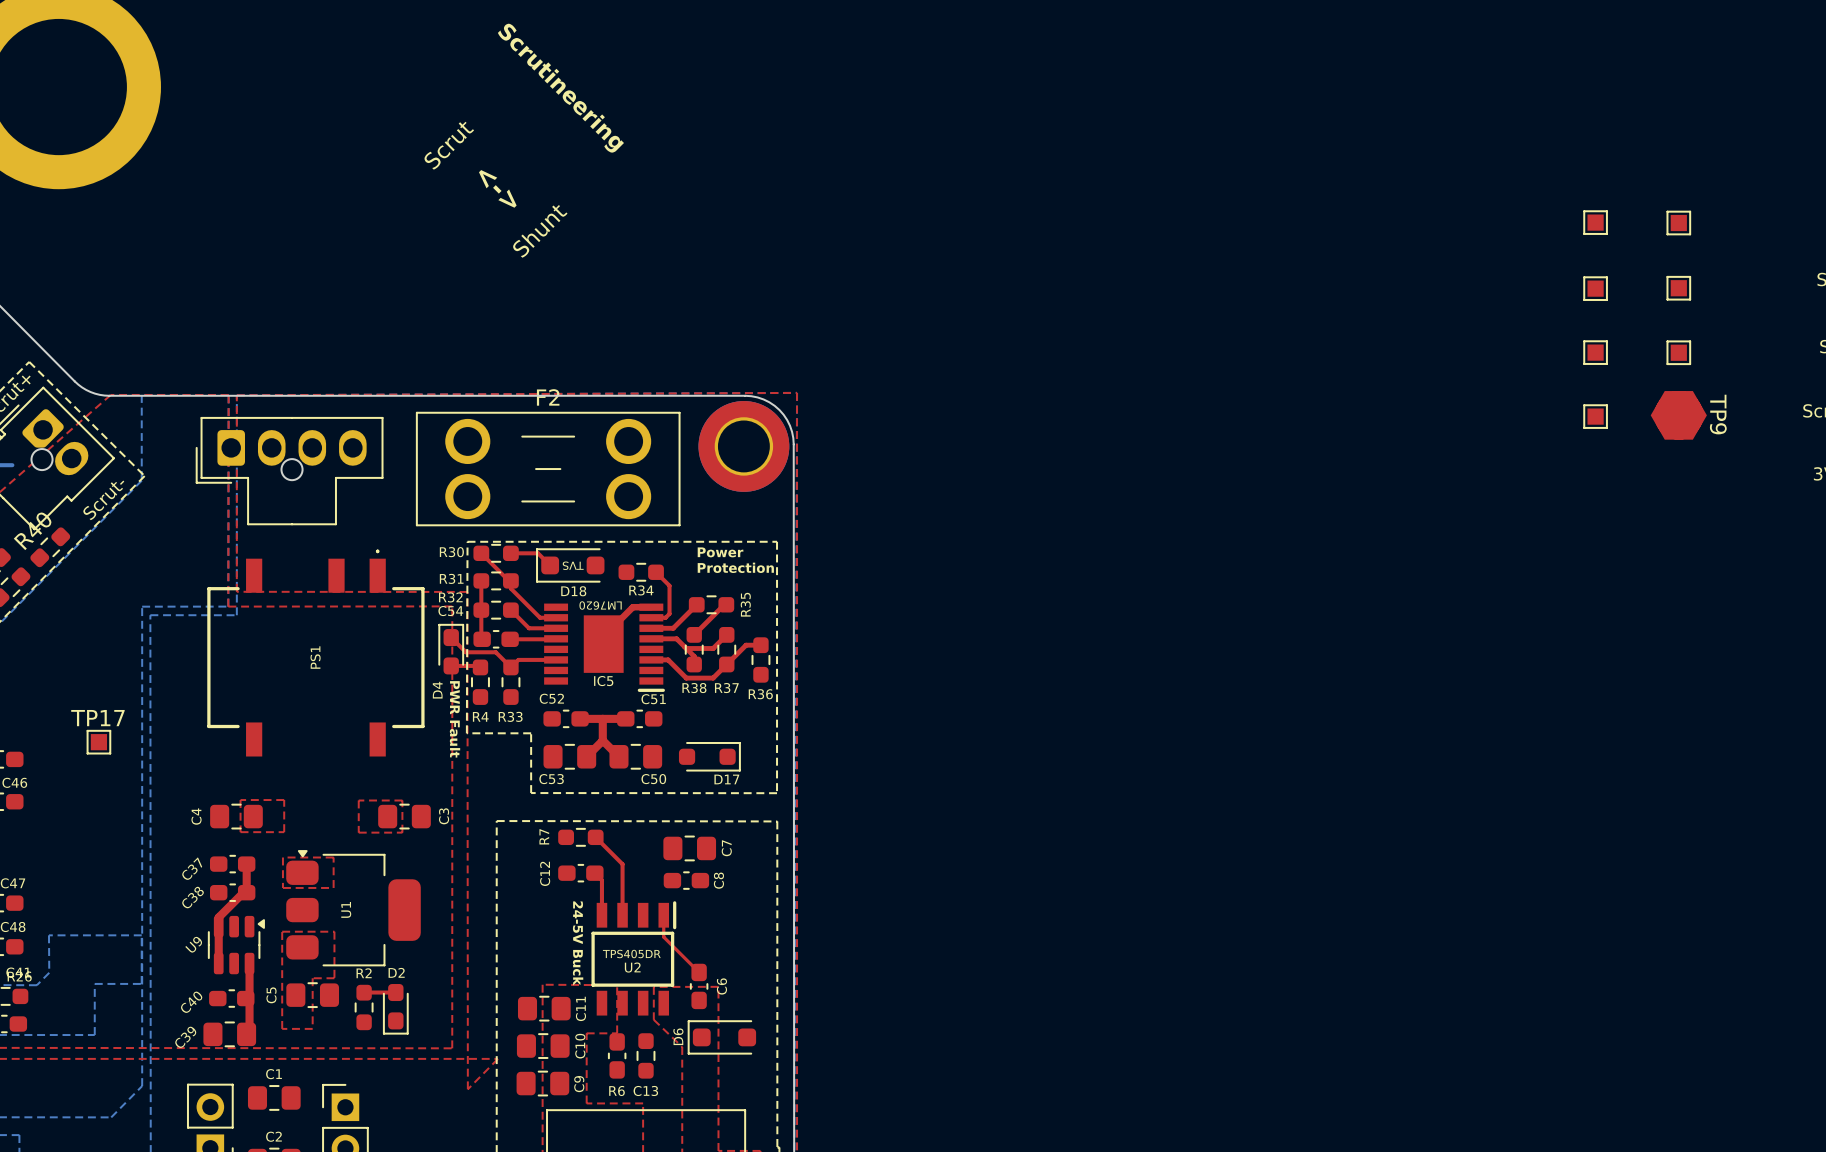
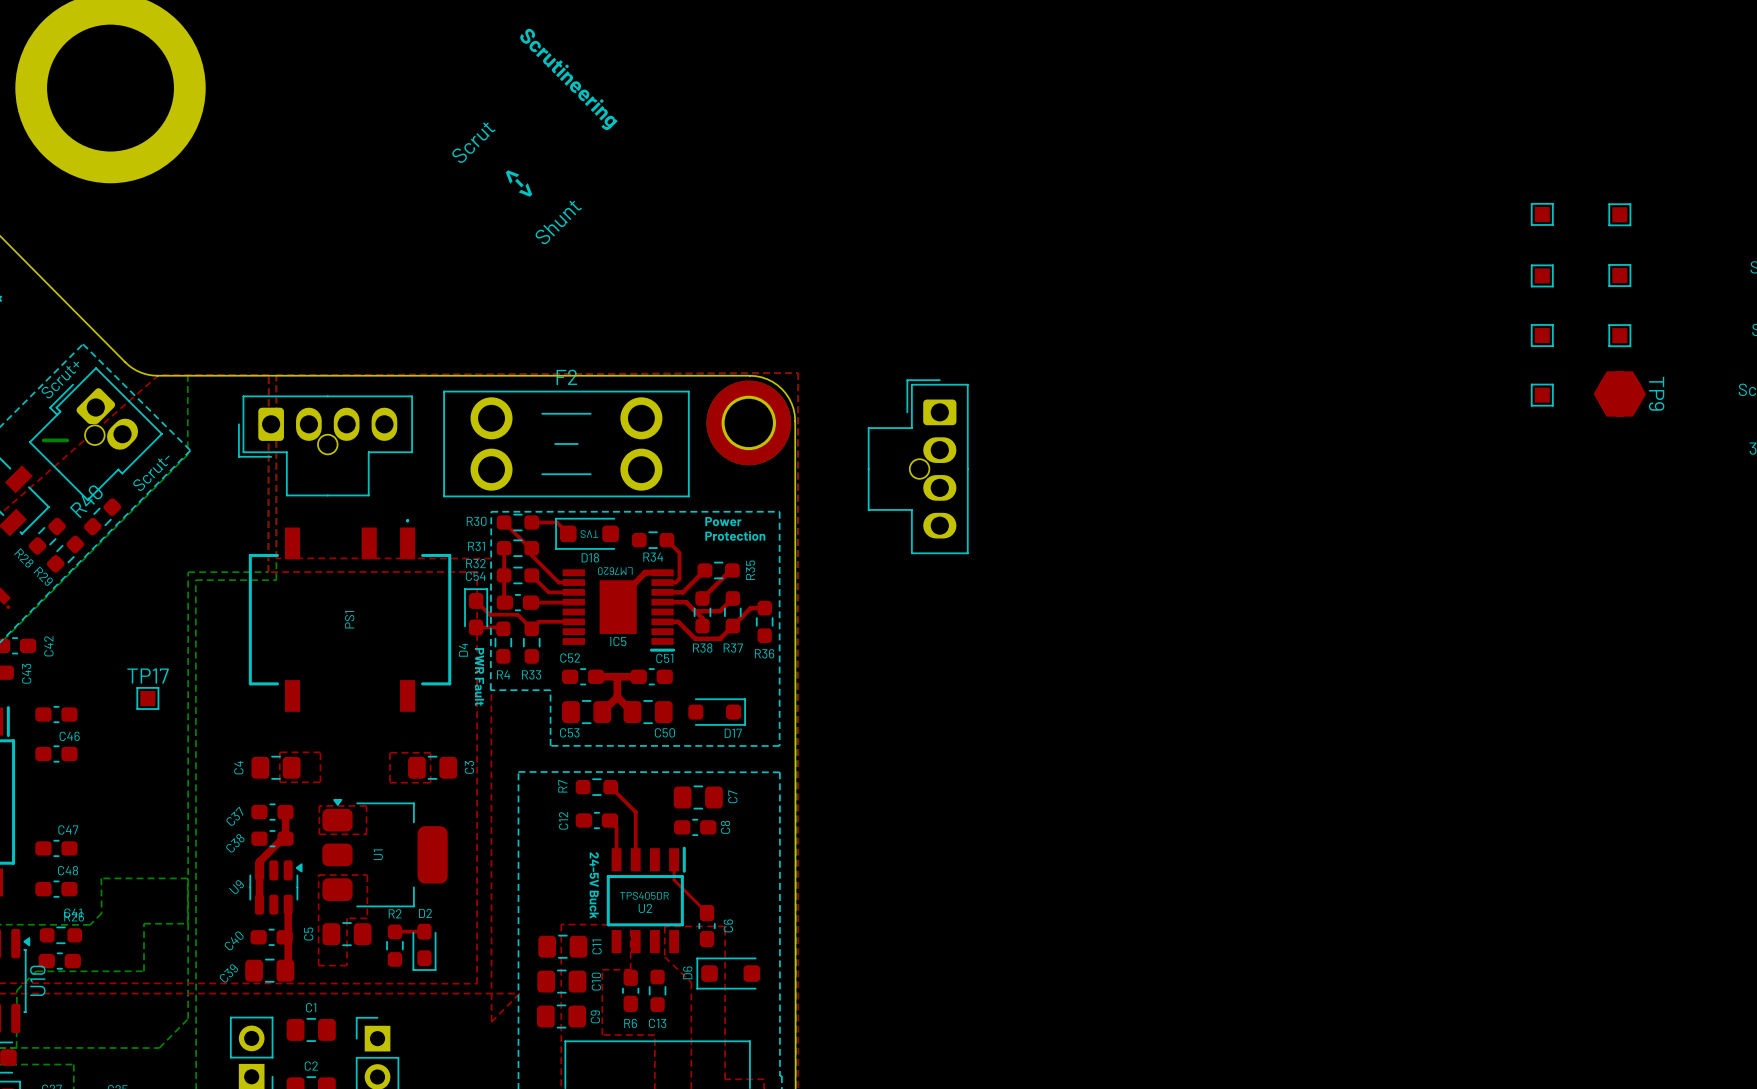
part: none -> (918, 466)

